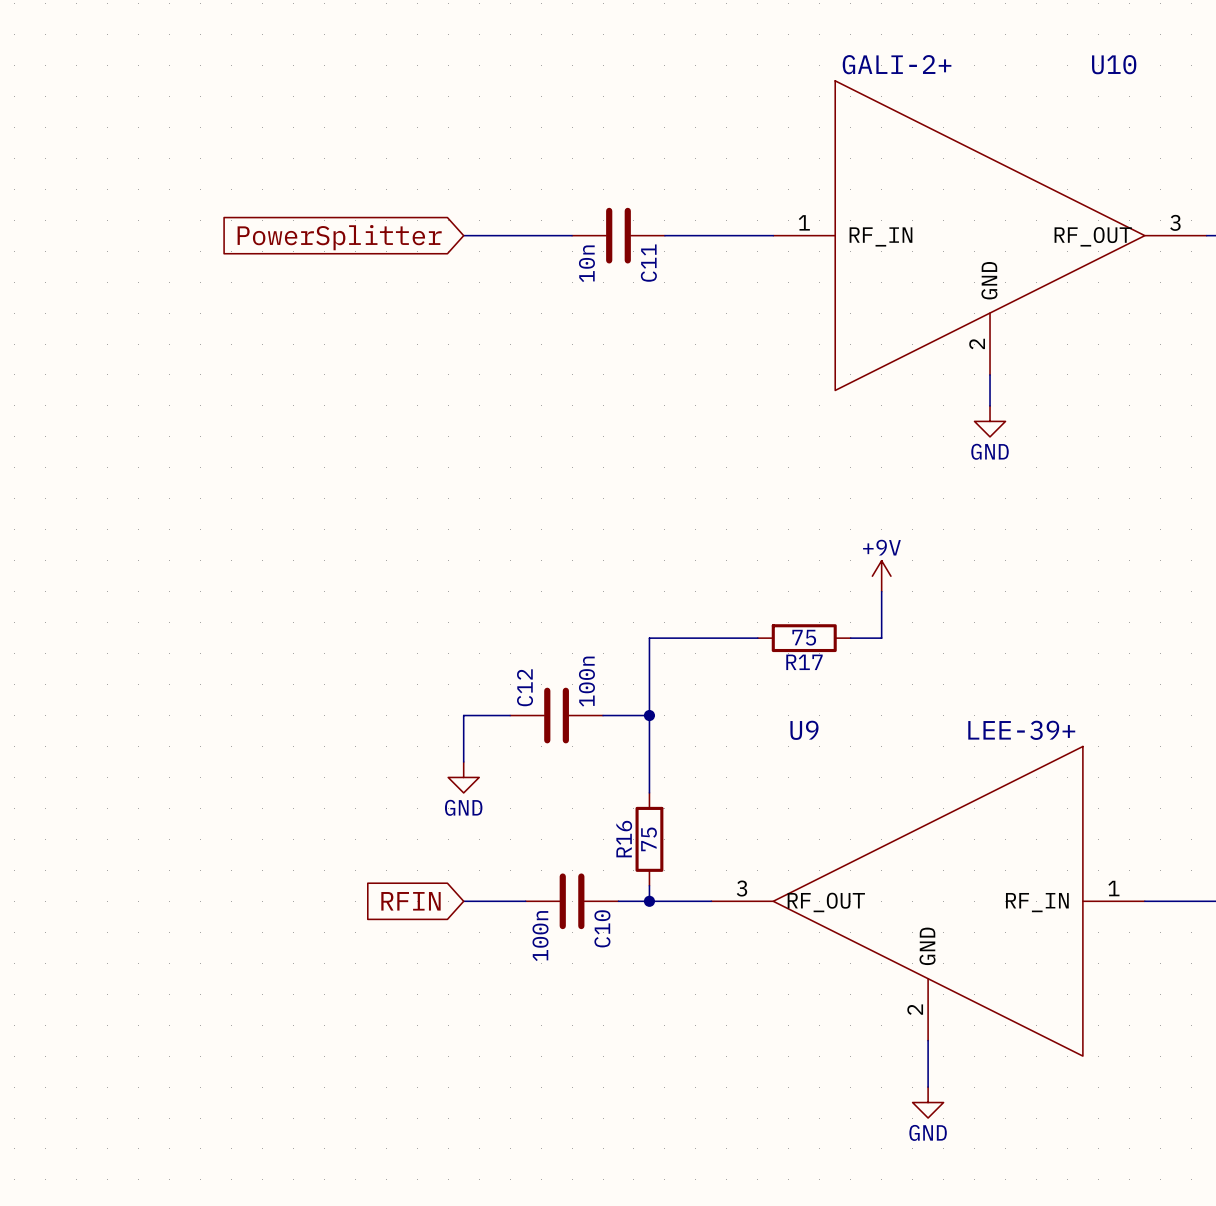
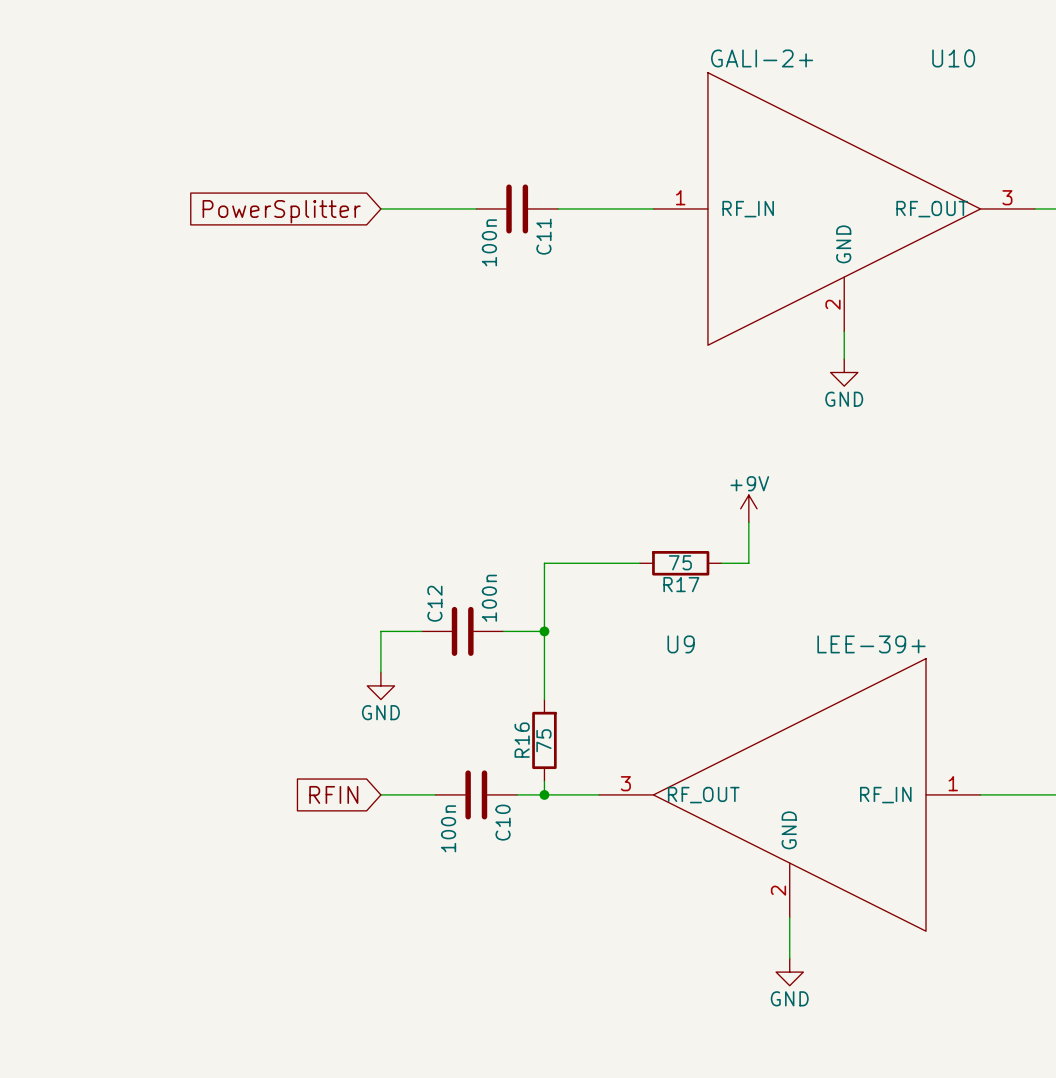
C11 value: 10n (586, 263) -> 100n (489, 242)

